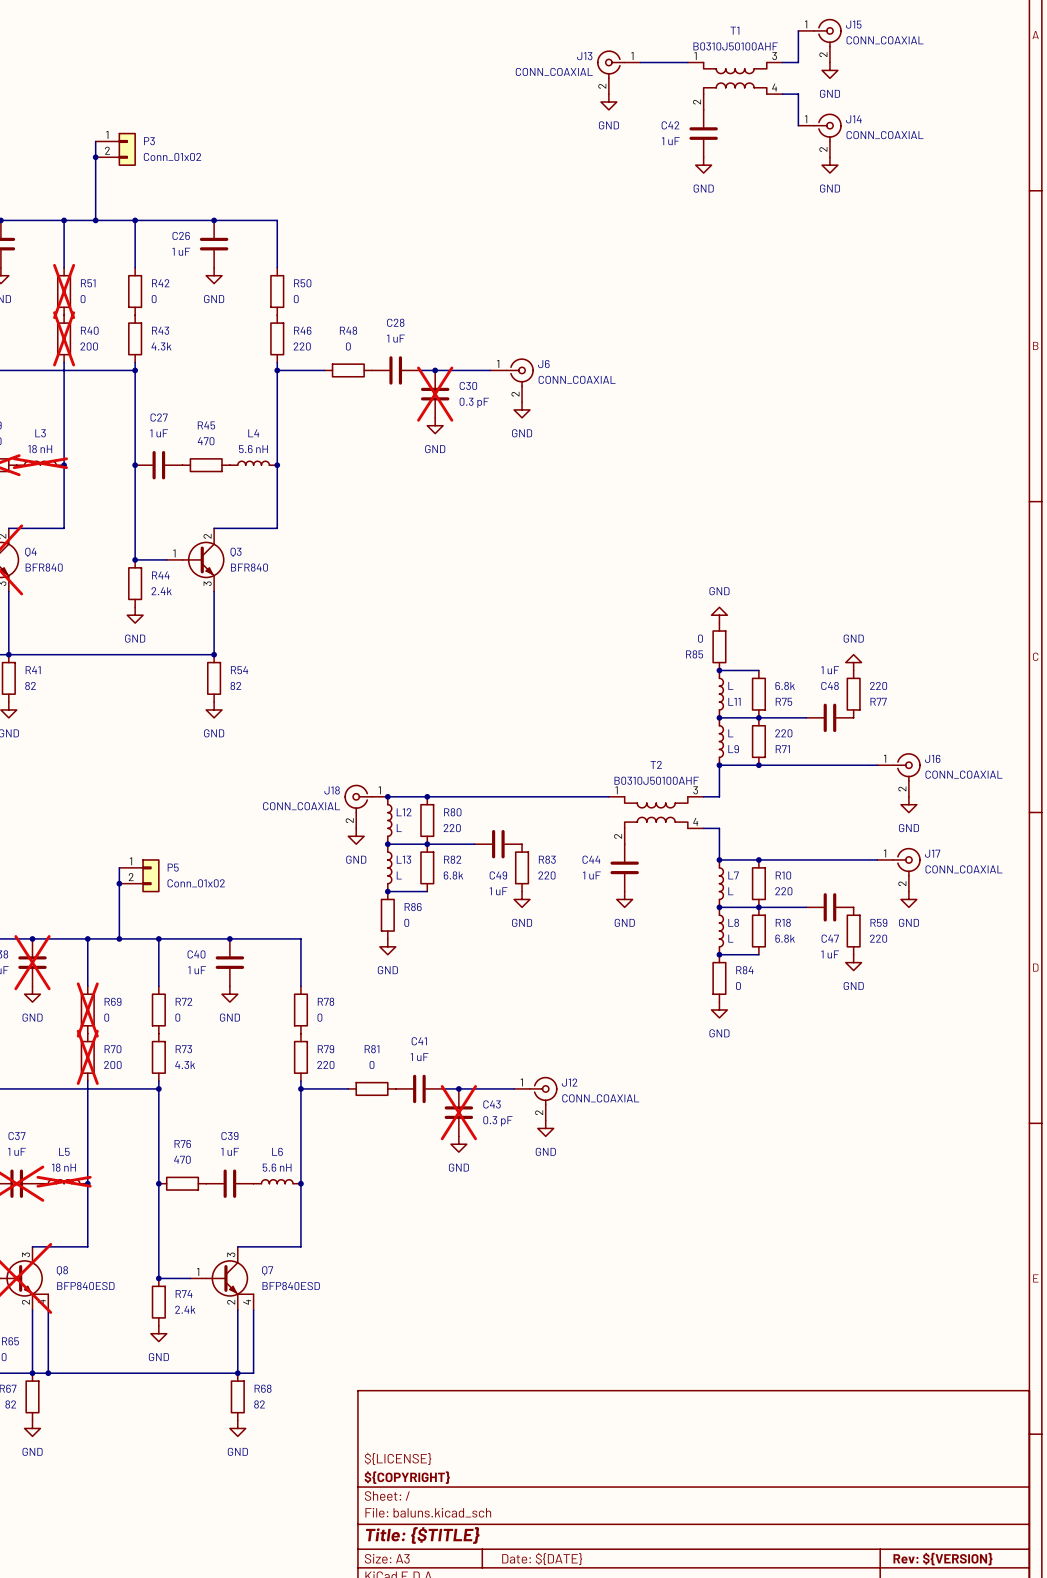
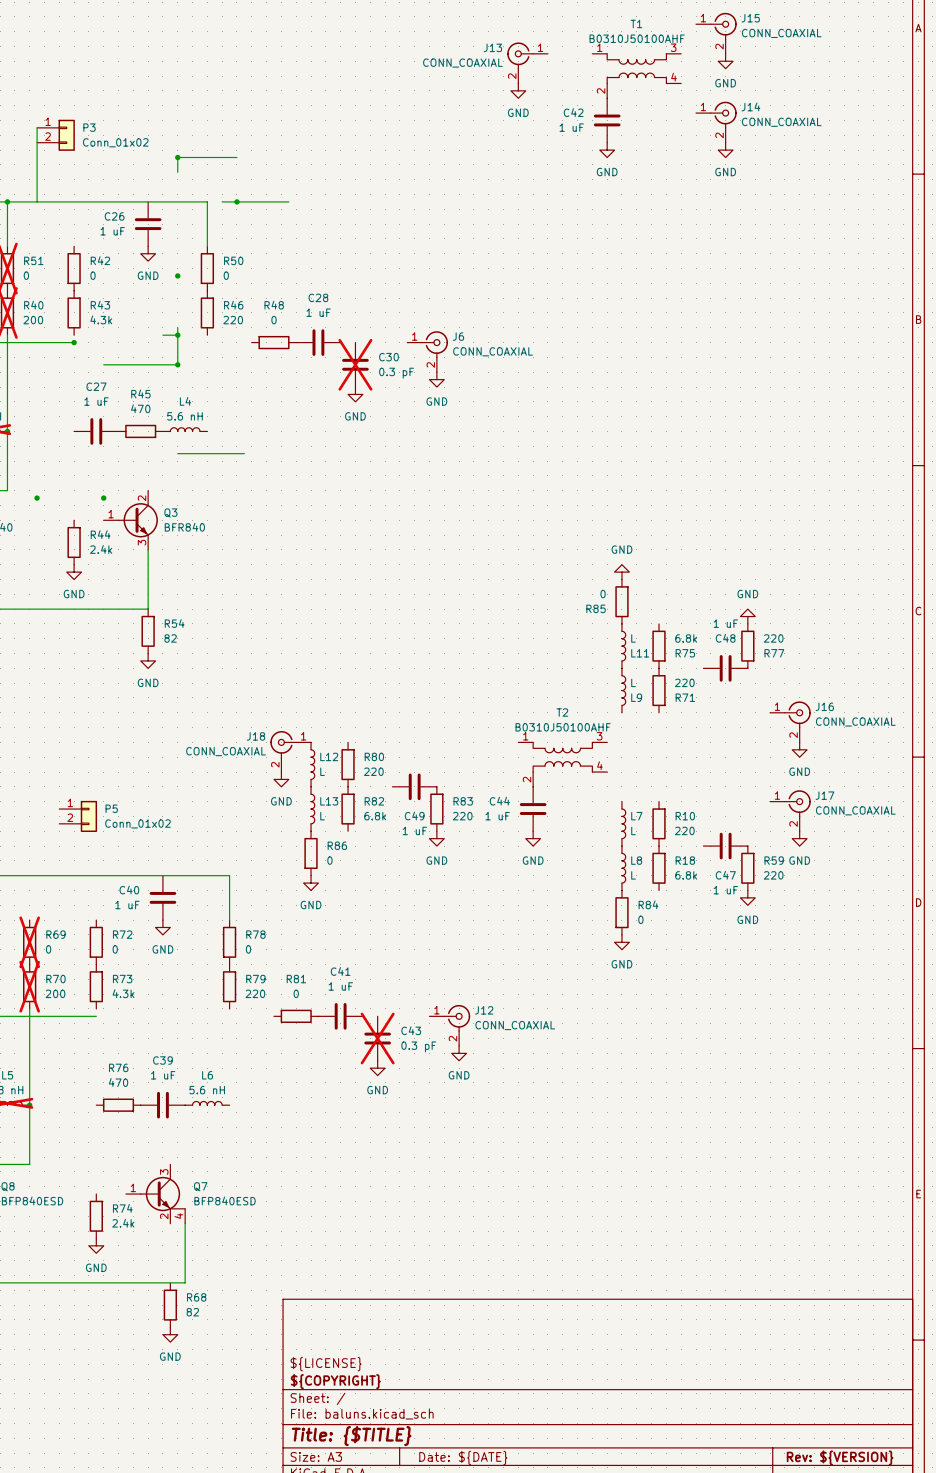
wire: (798, 30) (798, 62) (782, 62) -> none
wire: (640, 62) (687, 62) -> none
wire: (782, 94) (798, 94) (798, 125) -> none
junction: (95, 157) -> none
junction: none -> (177, 157)
wire: none -> (236, 157) (177, 157) (177, 172)
junction: (95, 220) -> none
wire: (135, 220) (135, 267) -> none
junction: (135, 220) -> none
junction: (214, 220) -> none
wire: none -> (222, 201) (288, 201)
junction: none -> (236, 201)
junction: none -> (177, 275)
wire: none -> (177, 327) (177, 364) (103, 364)
wire: (135, 362) (135, 559) (166, 559) -> none
wire: none -> (162, 335) (177, 335)
junction: none -> (177, 335)
wire: (277, 362) (277, 528) (214, 528) -> none
wire: (277, 370) (324, 370) -> none
junction: (277, 370) -> none
wire: (419, 370) (490, 370) -> none
junction: (435, 370) -> none
junction: none -> (177, 364)
junction: (135, 465) -> none
junction: (277, 465) -> none
wire: none -> (177, 453) (244, 453)
junction: none -> (37, 498)
junction: none -> (103, 498)
junction: (135, 559) -> none
junction: (214, 654) -> none
wire: (719, 670) (758, 670) -> none
junction: (719, 670) -> none
wire: (719, 717) (806, 717) -> none
junction: (719, 717) -> none
junction: (758, 717) -> none
junction: (719, 765) -> none
junction: (758, 765) -> none
wire: (877, 765) (719, 765) (719, 796) (703, 796) -> none
wire: (387, 796) (608, 796) -> none
junction: (387, 796) -> none
junction: (427, 796) -> none
wire: (703, 828) (719, 828) (719, 859) (877, 859) -> none
wire: (387, 844) (474, 844) -> none
junction: (387, 844) -> none
junction: (427, 844) -> none
junction: (719, 859) -> none
junction: (758, 859) -> none
wire: (119, 867) (119, 938) -> none
junction: (119, 883) -> none
wire: (387, 891) (427, 891) -> none
junction: (387, 891) -> none
wire: (719, 907) (806, 907) -> none
junction: (719, 907) -> none
junction: (758, 907) -> none
wire: (87, 938) (87, 986) -> none
junction: (87, 938) -> none
junction: (119, 938) -> none
wire: (158, 938) (158, 986) -> none
junction: (158, 938) -> none
junction: (229, 938) -> none
wire: (719, 954) (758, 954) -> none
junction: (719, 954) -> none
wire: (158, 1081) (158, 1278) (190, 1278) -> none
wire: (300, 1081) (300, 1246) (237, 1246) -> none
junction: (158, 1088) -> none
wire: (300, 1088) (348, 1088) -> none
junction: (300, 1088) -> none
wire: (443, 1088) (514, 1088) -> none
junction: (458, 1088) -> none
junction: (158, 1183) -> none
junction: (300, 1183) -> none
junction: (158, 1278) -> none
wire: (237, 1310) (237, 1373) -> none
junction: (237, 1373) -> none

